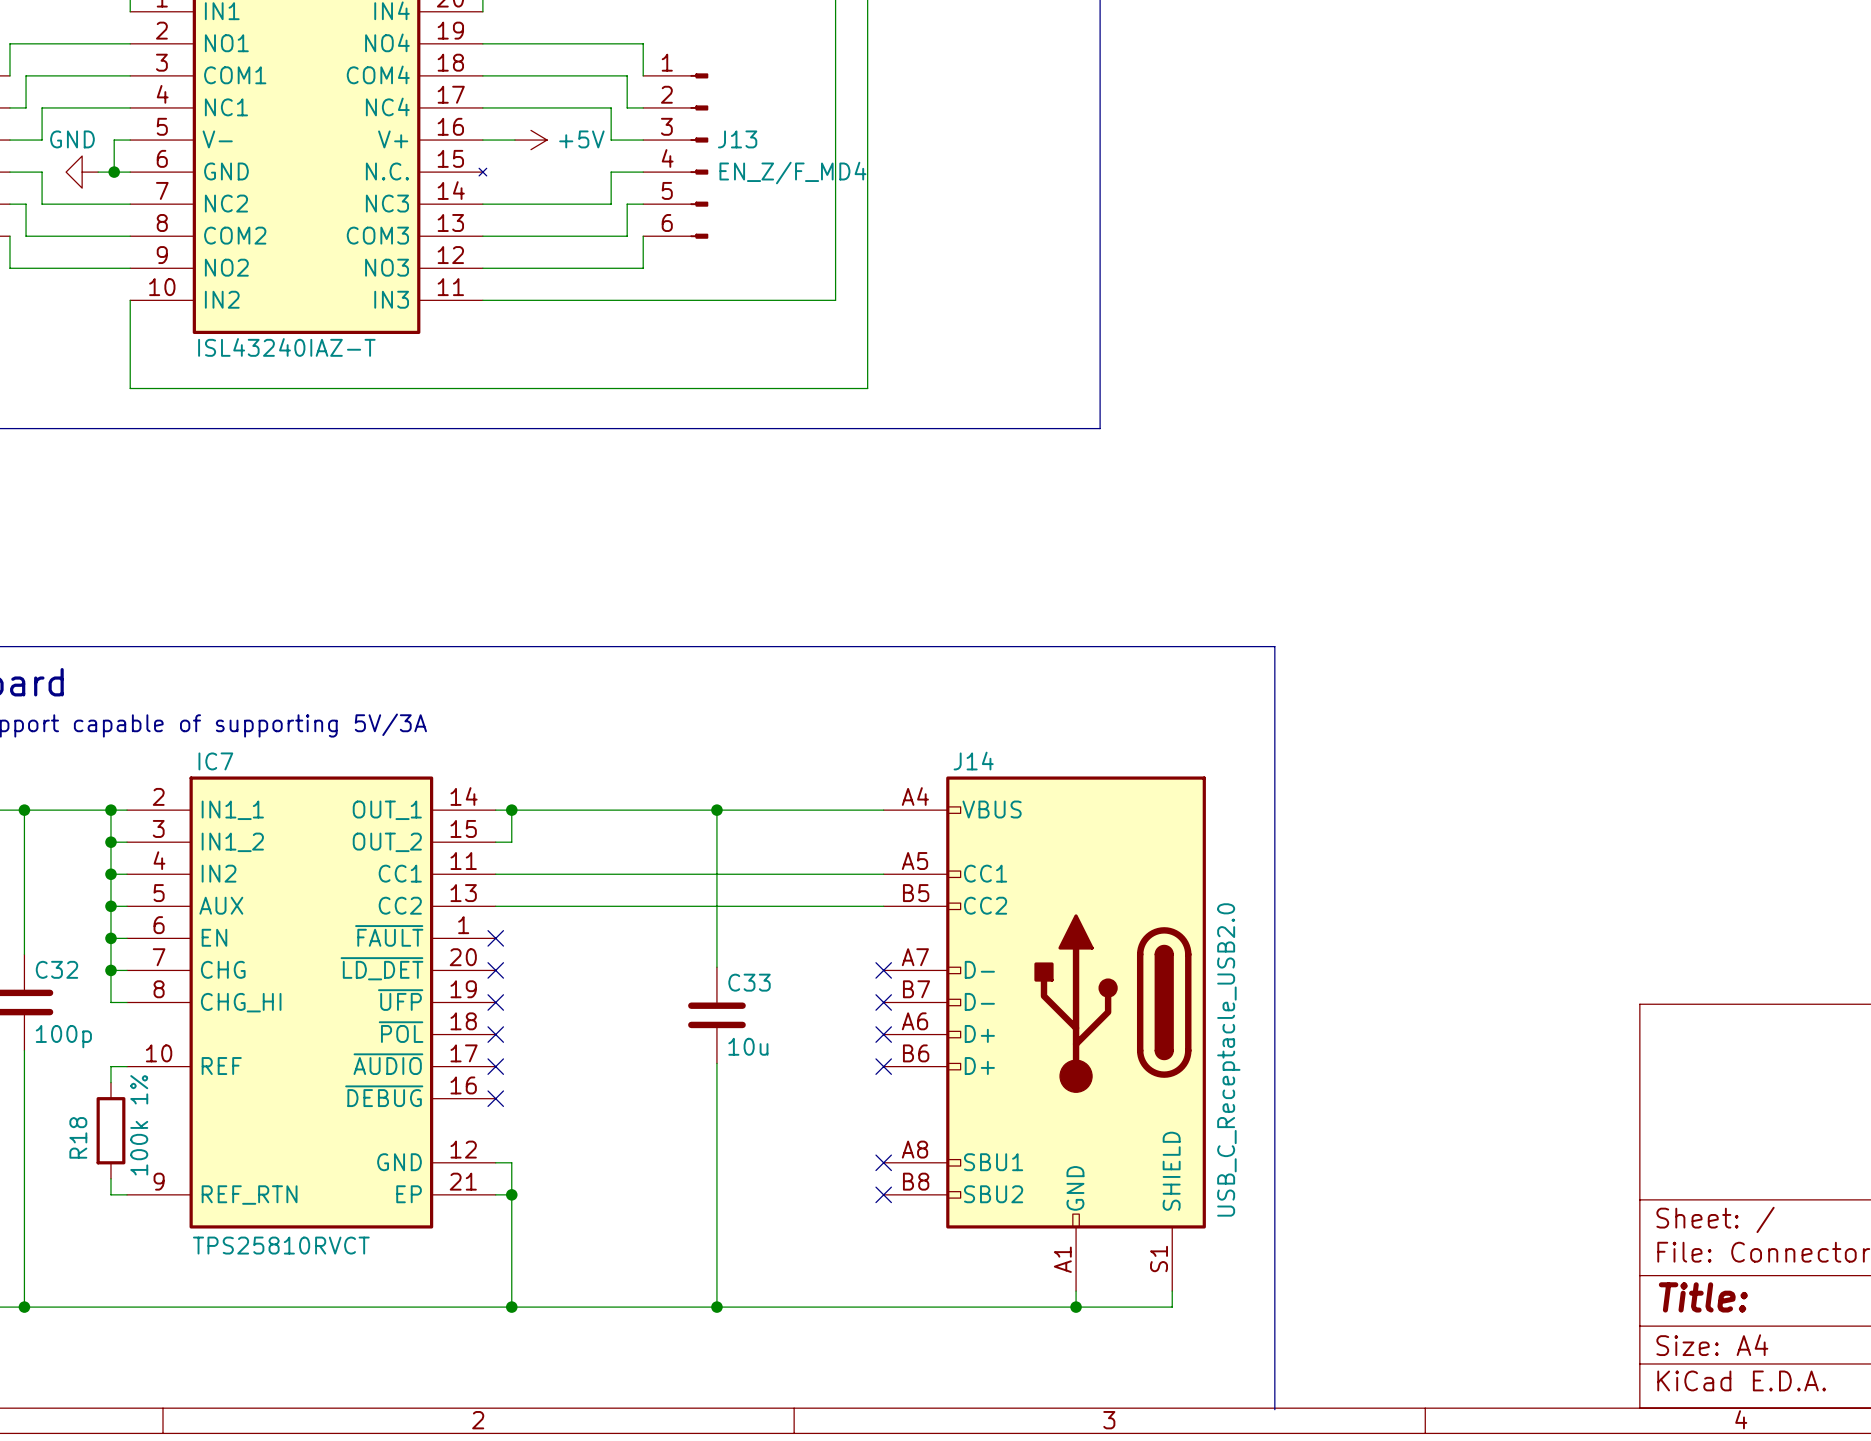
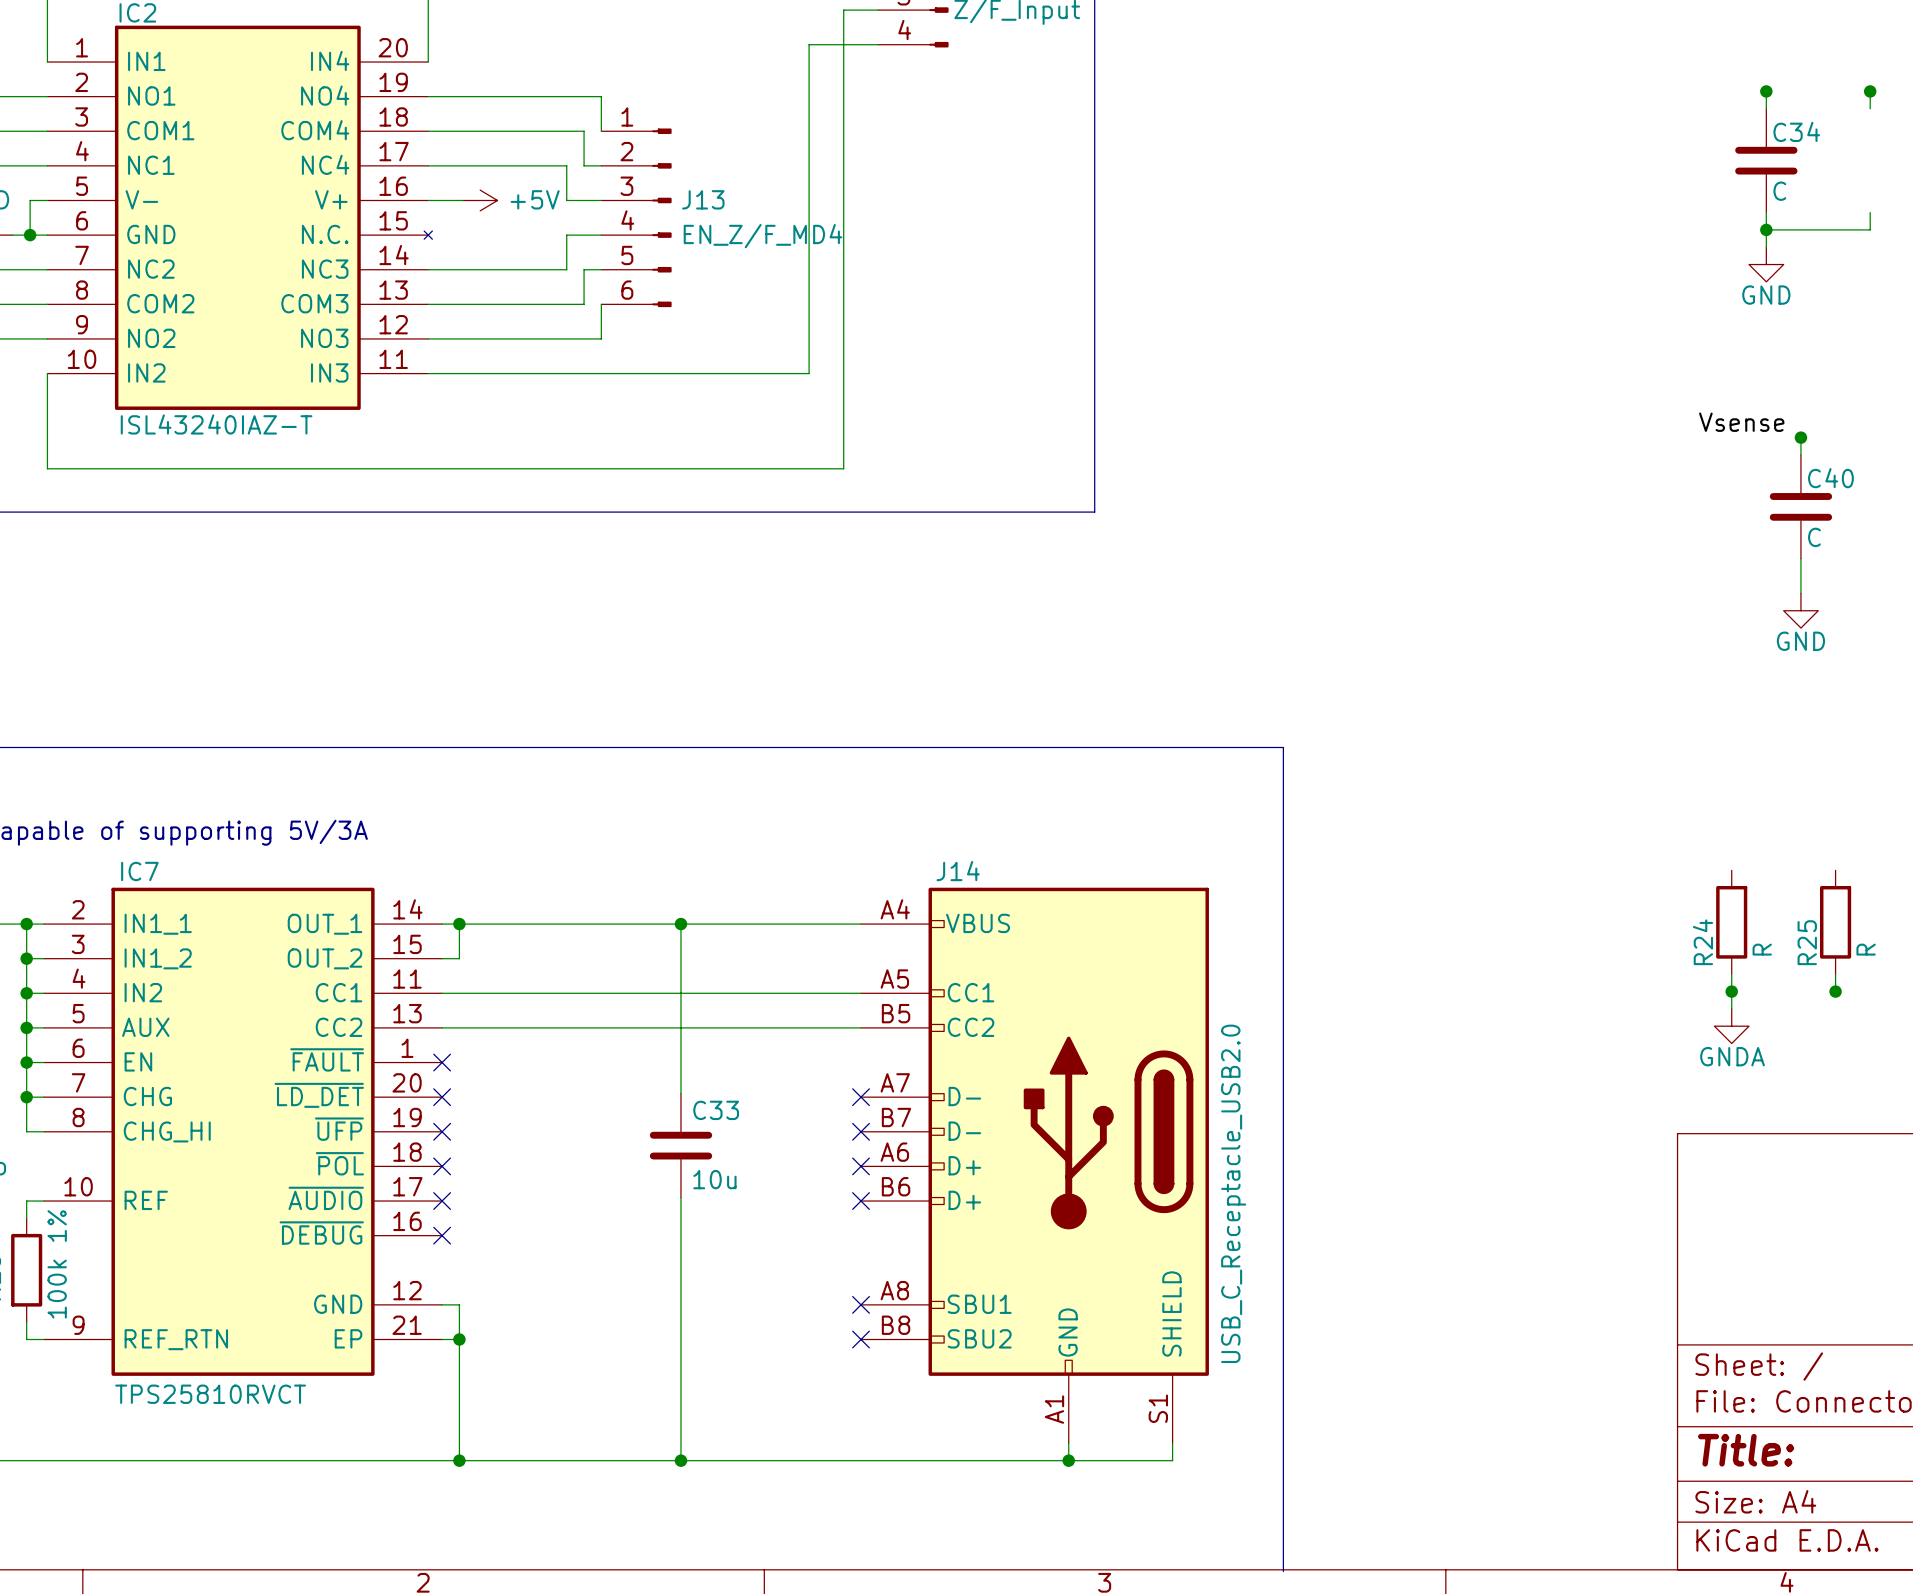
wire: none -> (1766, 91) (1766, 108)
junction: none -> (1766, 91)
wire: none -> (1870, 91) (1870, 108)
junction: none -> (1870, 91)
C34: none -> C (1766, 160)
wire: none -> (1766, 212) (1766, 247)
wire: none -> (1870, 212) (1870, 229) (1766, 229)
junction: none -> (1766, 229)
power symbol: none -> GND (1766, 264)
label: none -> Vsense (1741, 422)
wire: none -> (1800, 437) (1800, 454)
junction: none -> (1800, 437)
C40: none -> C (1800, 506)
wire: none -> (1800, 558) (1800, 593)
power symbol: none -> GND (1800, 610)
R24: none -> R (1731, 922)
R25: none -> R (1835, 922)
wire: none -> (1731, 974) (1731, 1008)
wire: none -> (1835, 974) (1835, 991)
junction: none -> (1731, 991)
junction: none -> (1835, 991)
power symbol: none -> GNDA (1731, 1026)

